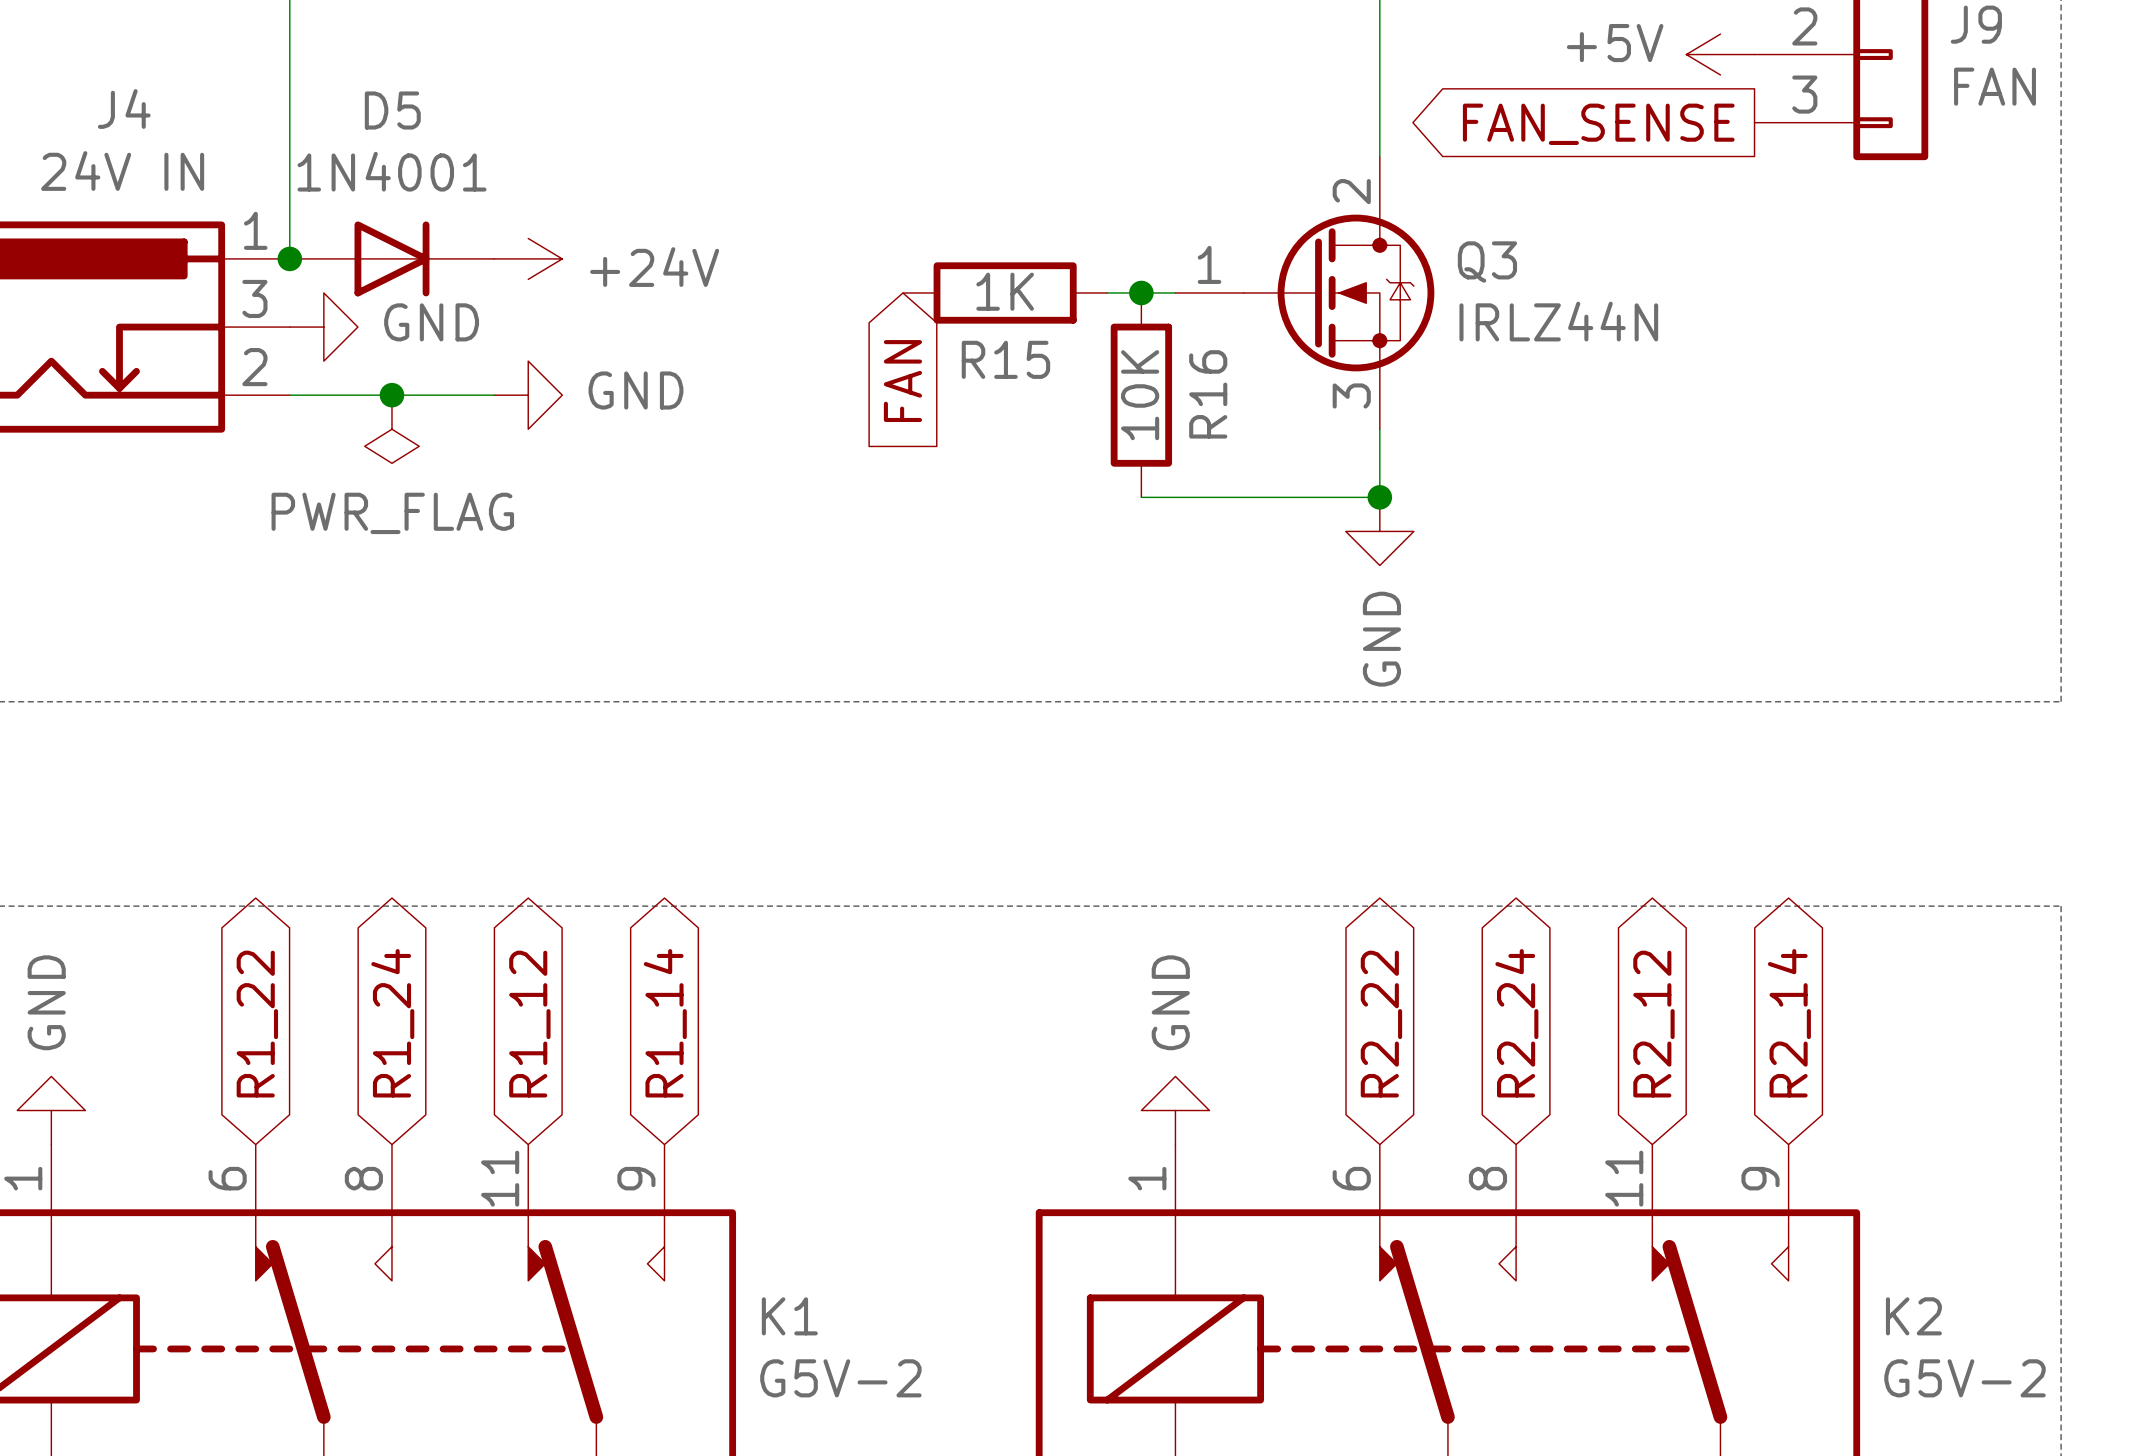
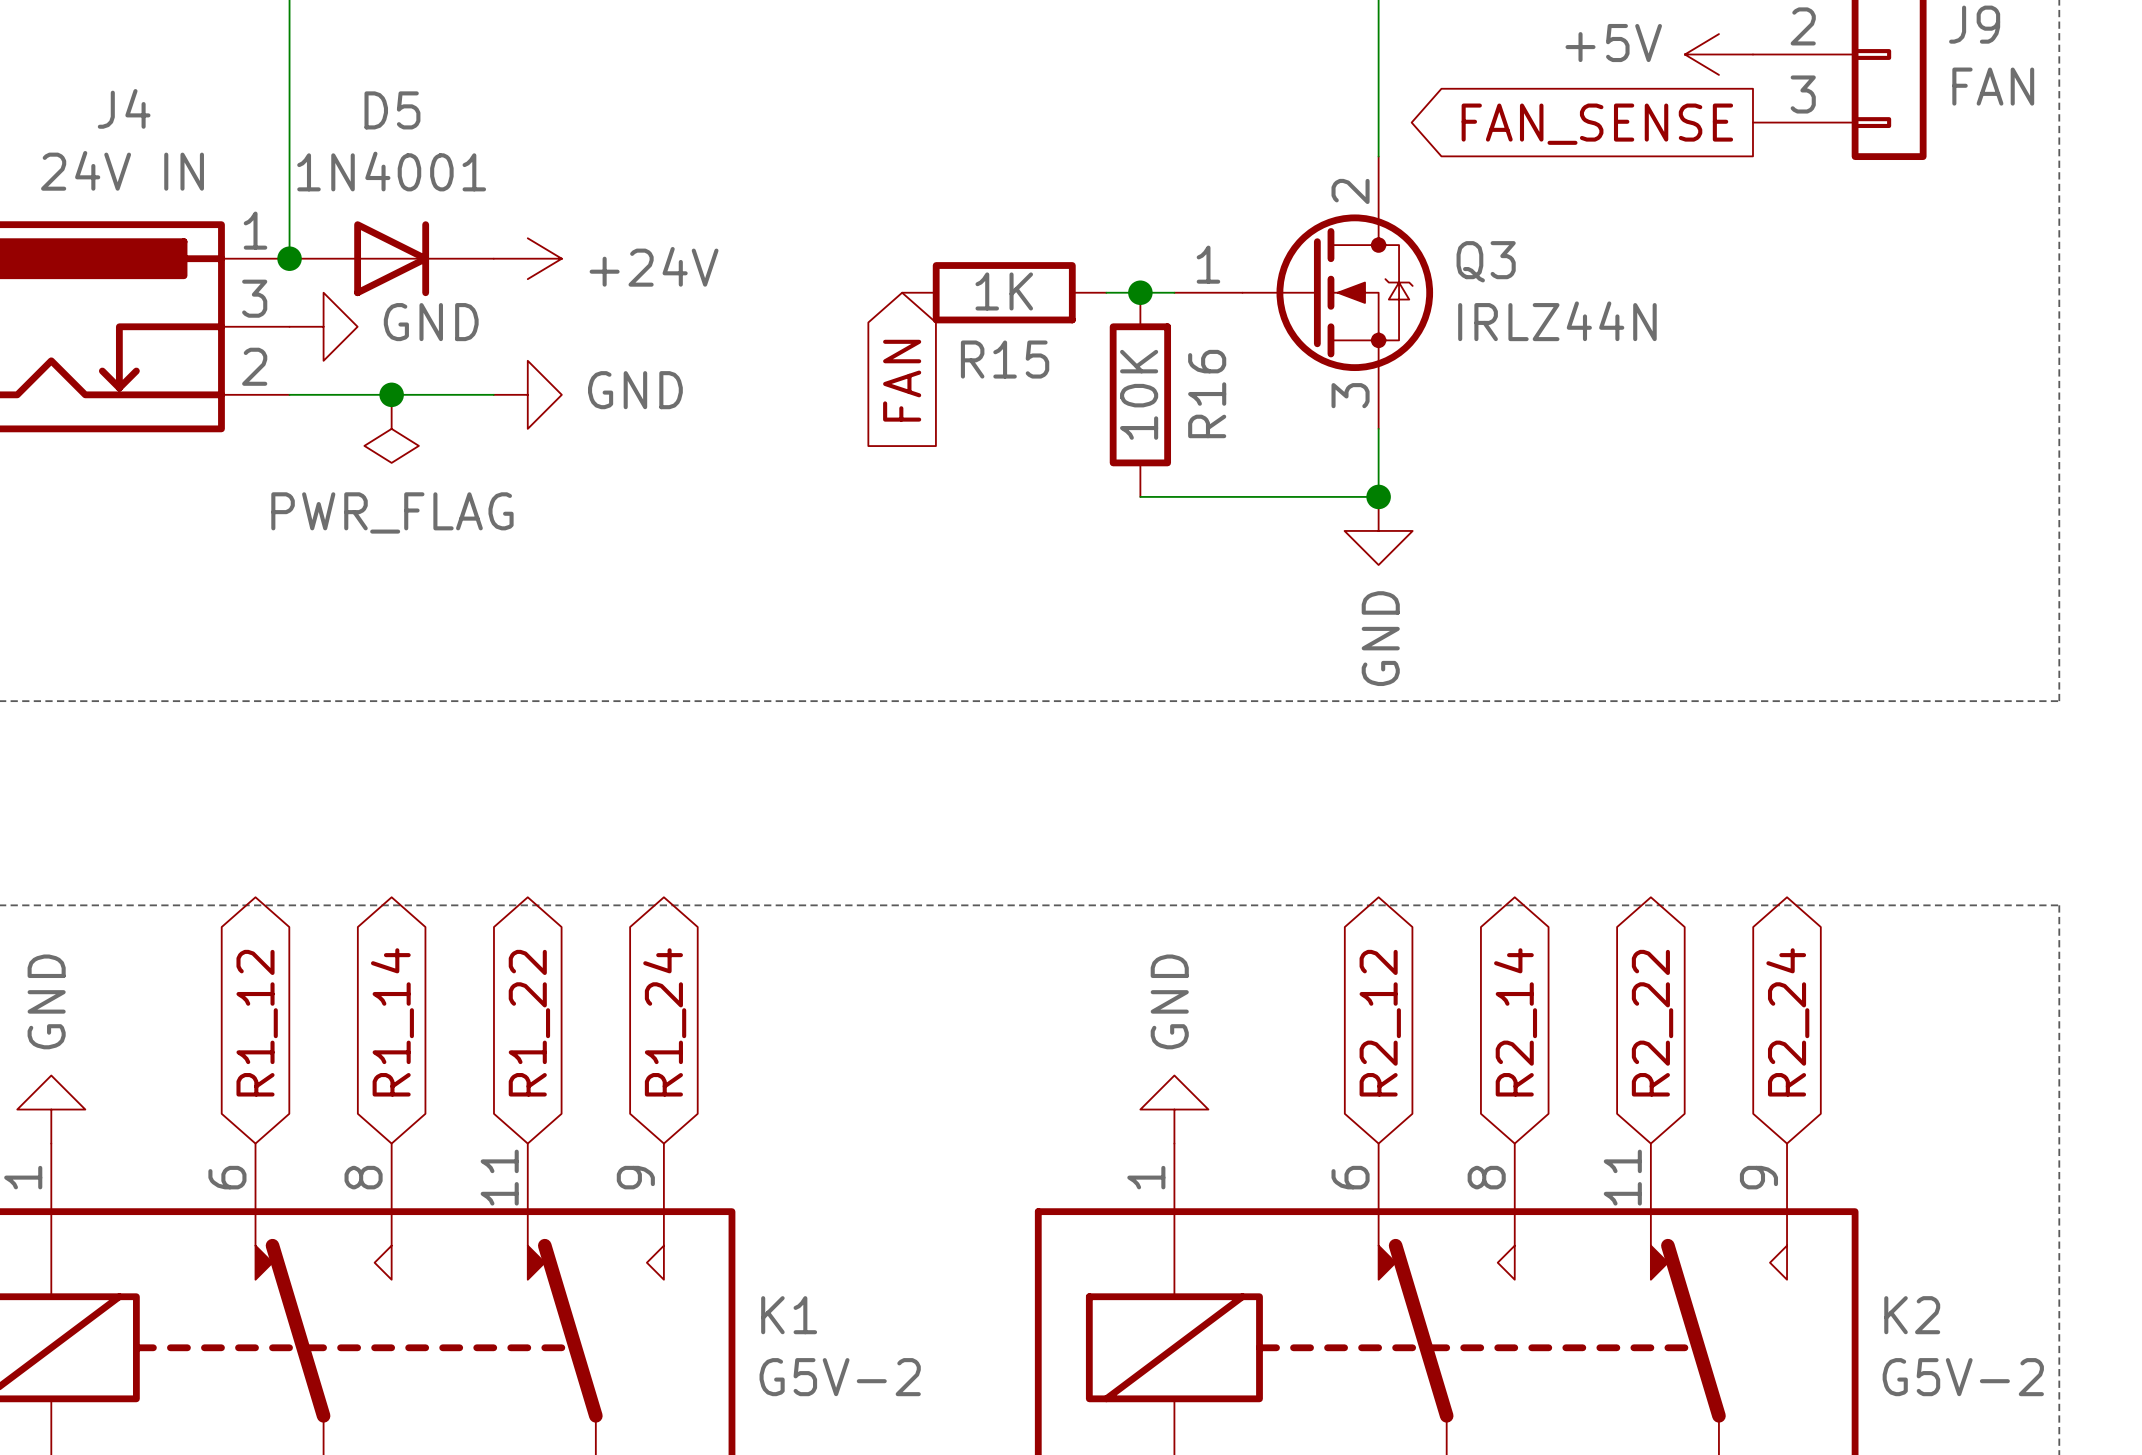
global label: R1_24 (392, 1023) -> R1_14 (392, 1022)
global label: R1_14 (665, 1023) -> R1_24 (664, 1022)
global label: R2_24 (1516, 1023) -> R2_14 (1515, 1022)
global label: R2_14 (1789, 1023) -> R2_24 (1787, 1022)
global label: R1_22 (257, 1024) -> R1_12 (257, 1023)
global label: R1_12 (529, 1024) -> R1_22 (529, 1023)
global label: R2_22 (1381, 1024) -> R2_12 (1380, 1023)
global label: R2_12 (1653, 1024) -> R2_22 (1652, 1023)

